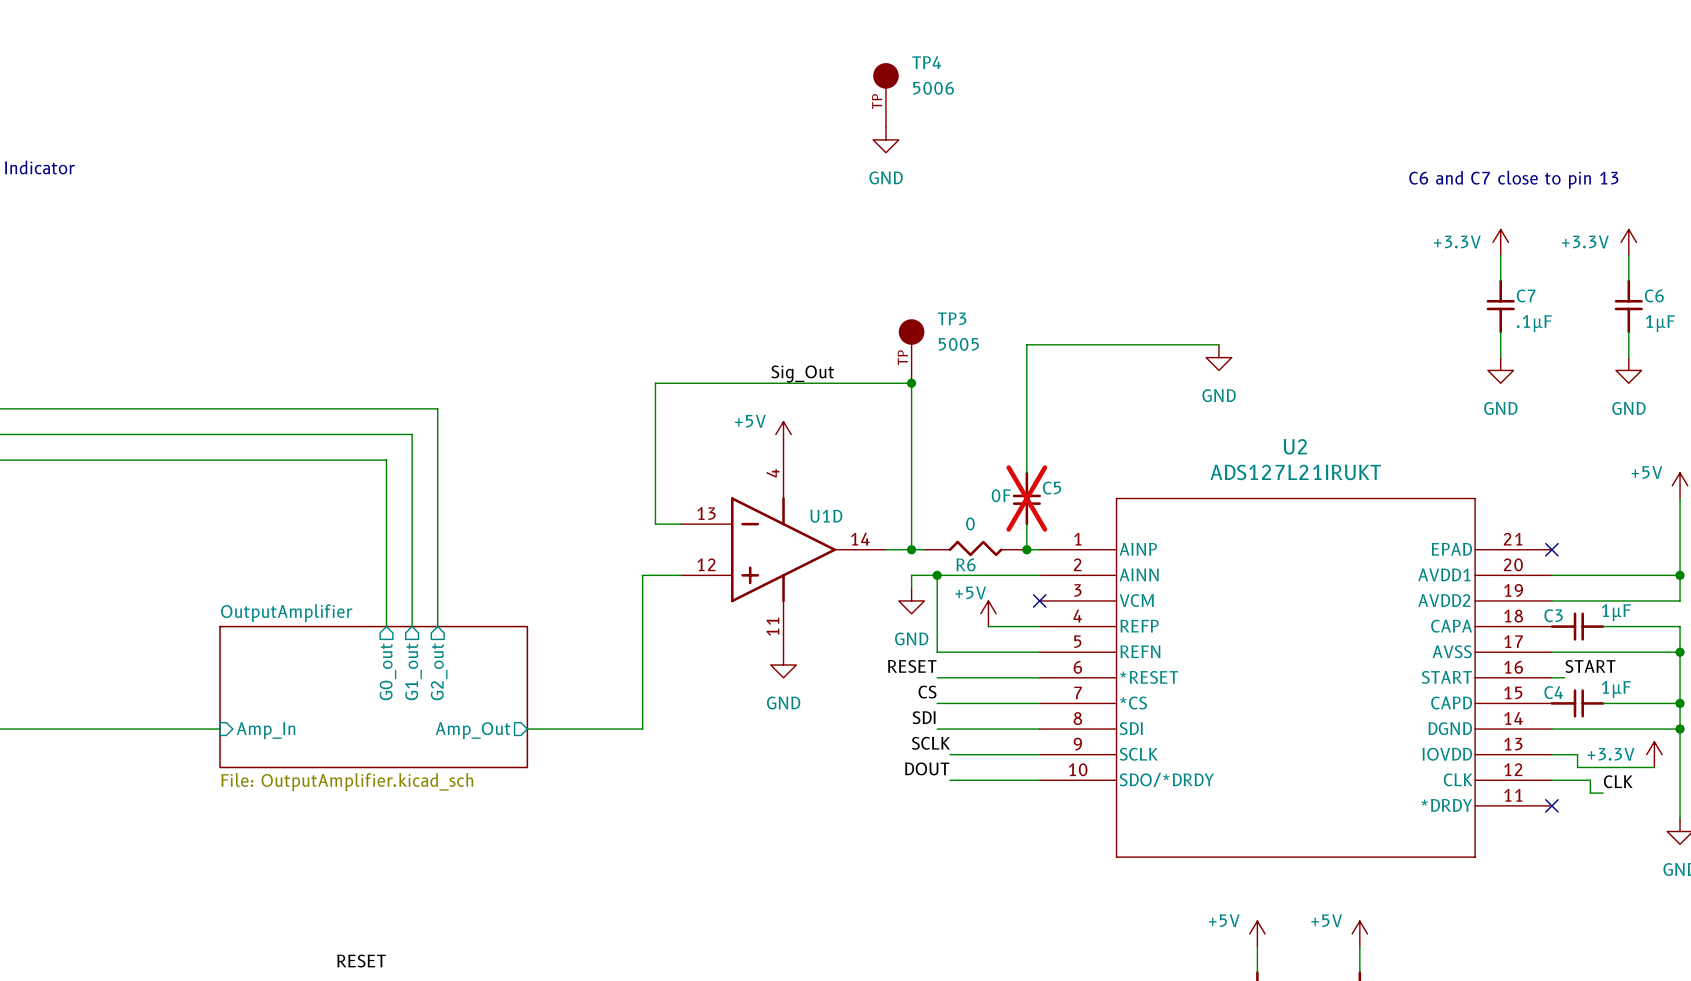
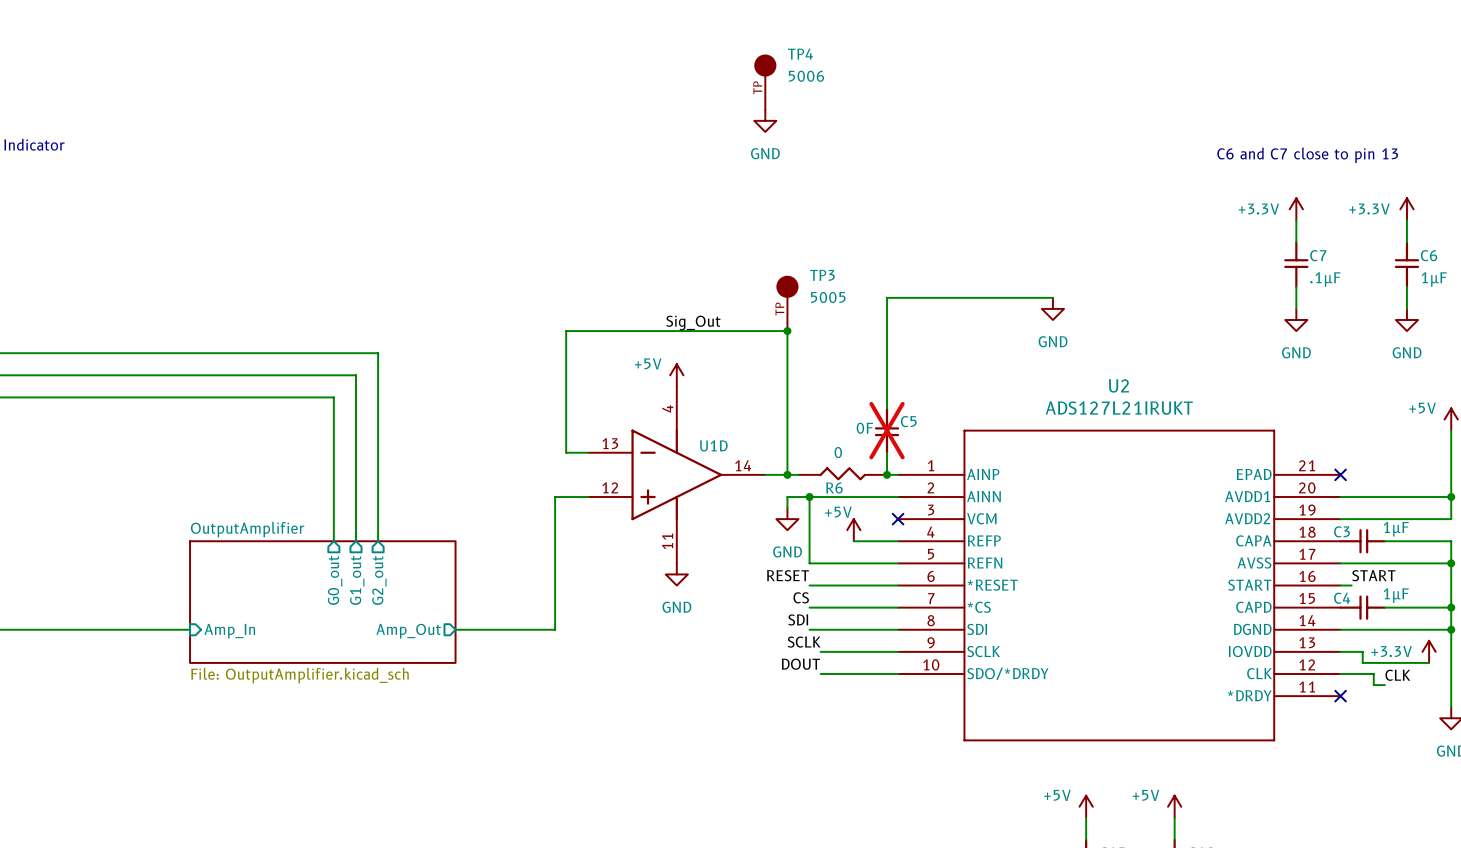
label: RESET (361, 961) -> none

